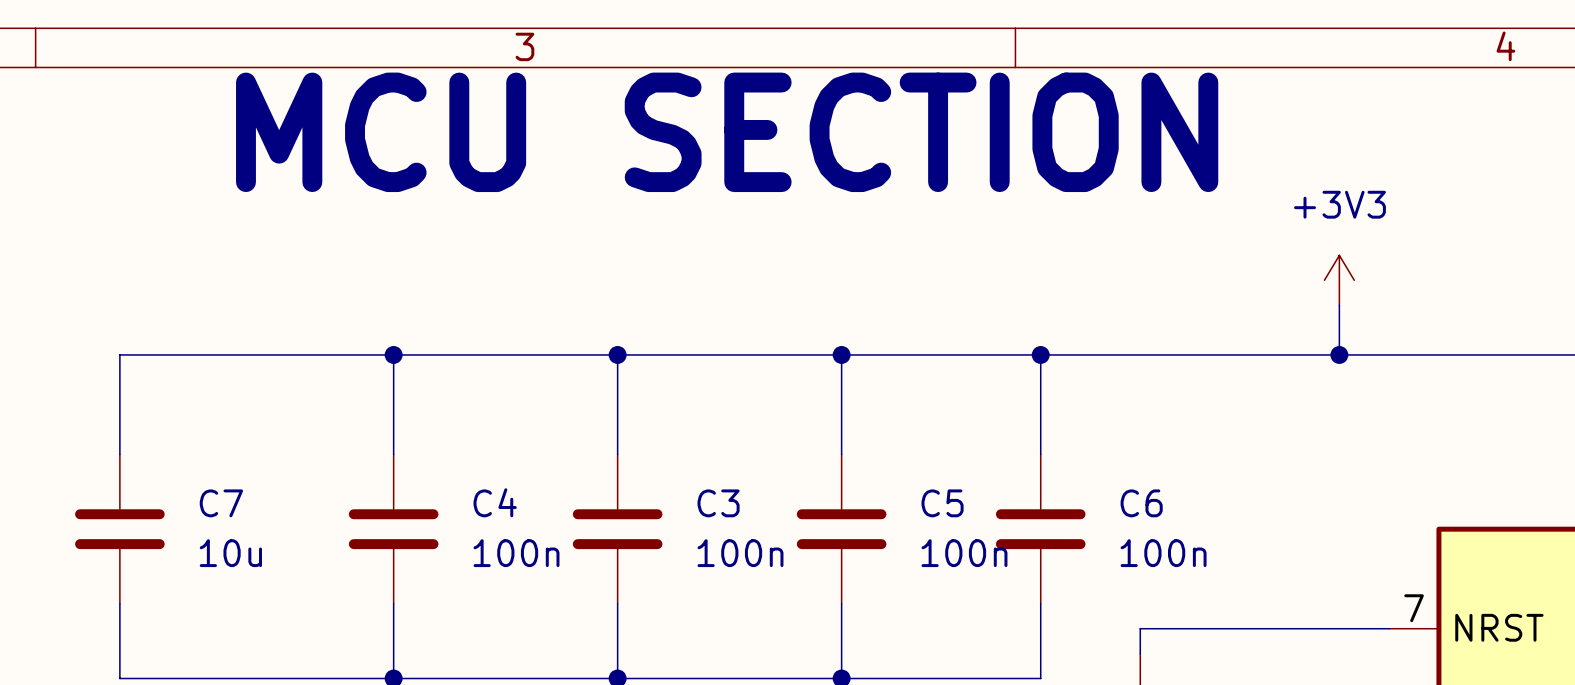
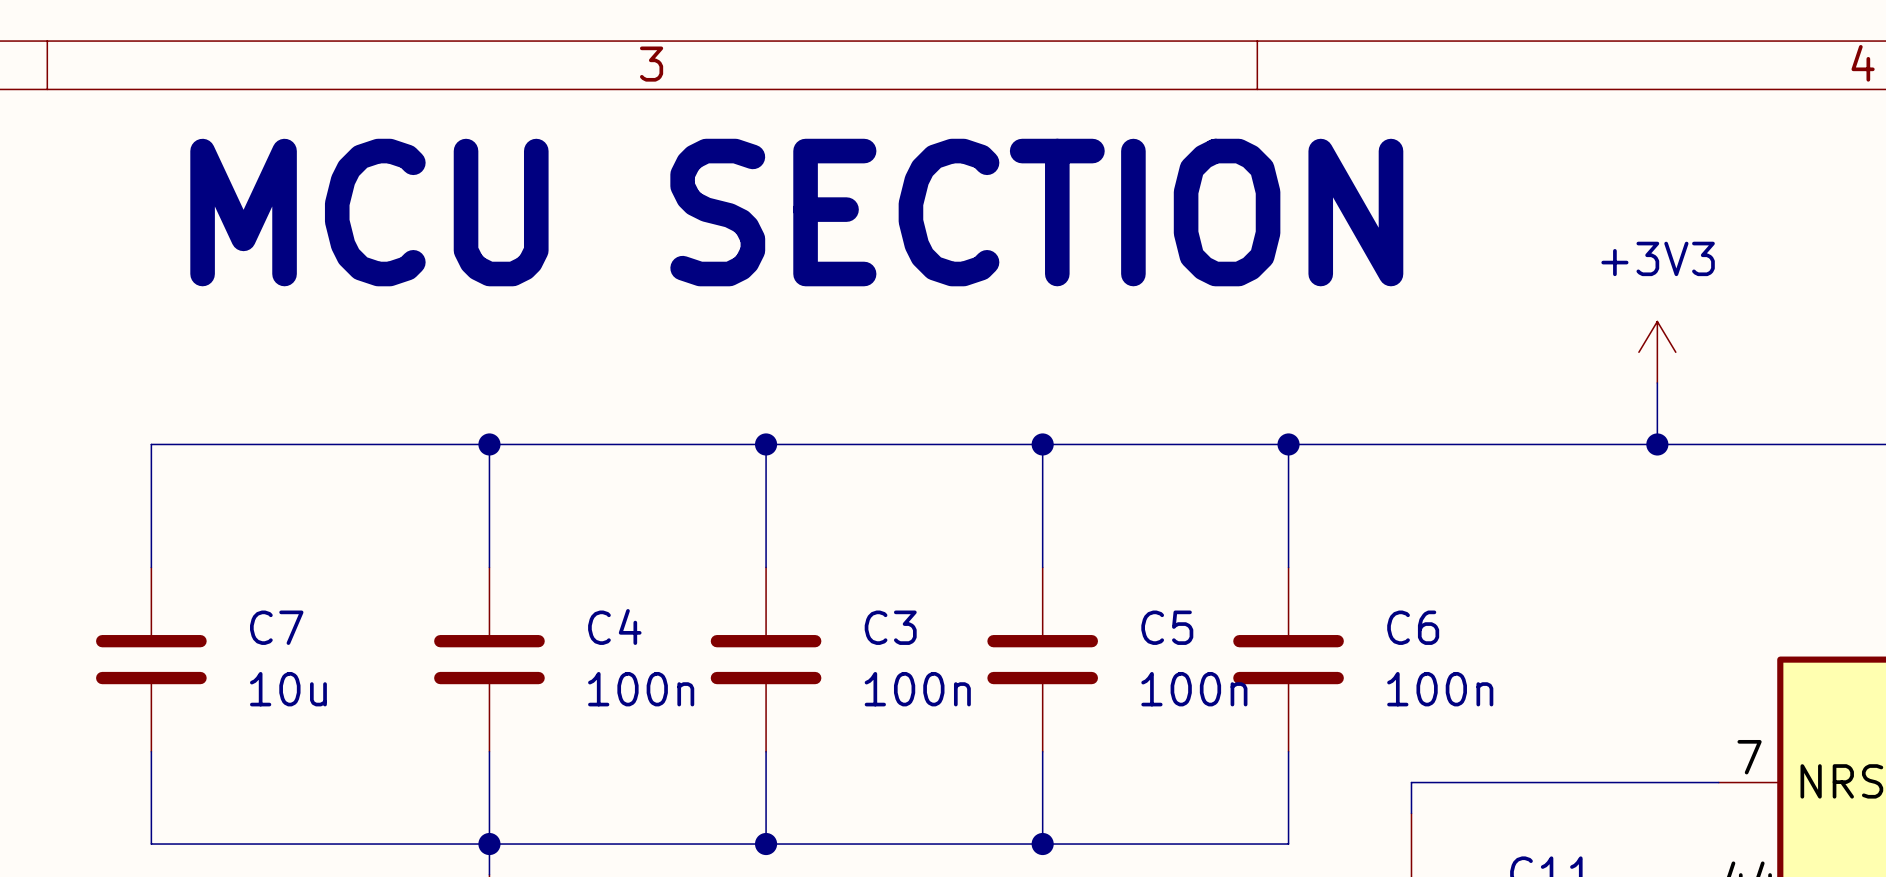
text position: MCU SECTION (727, 132) -> MCU SECTION (796, 212)

